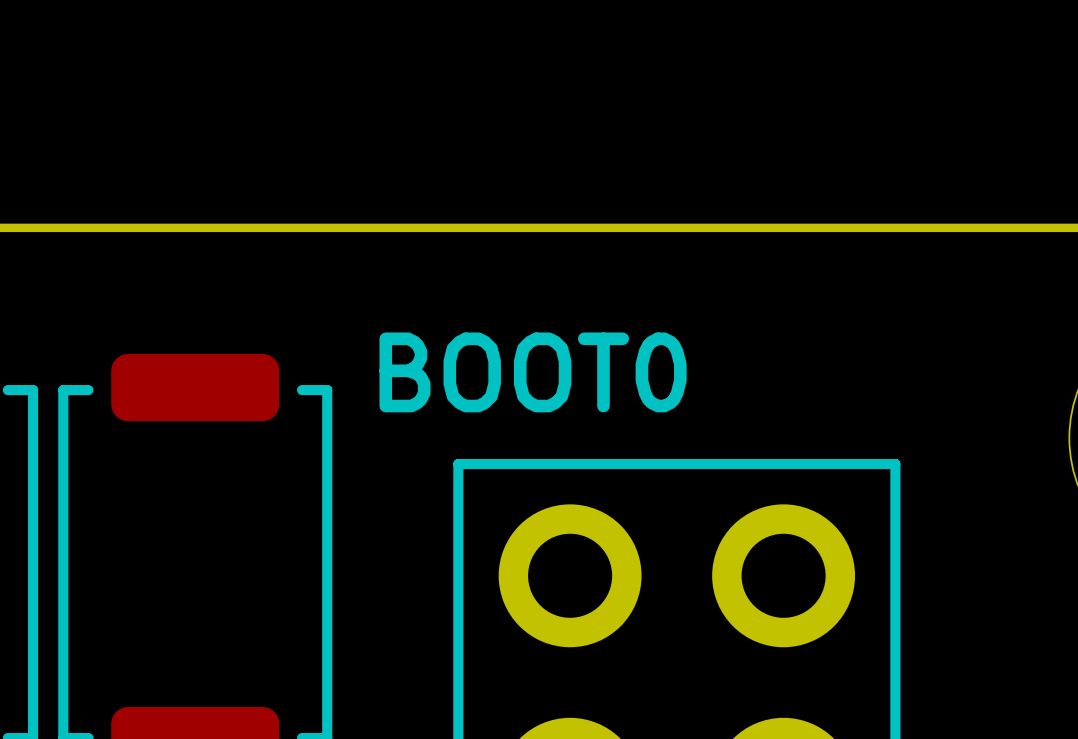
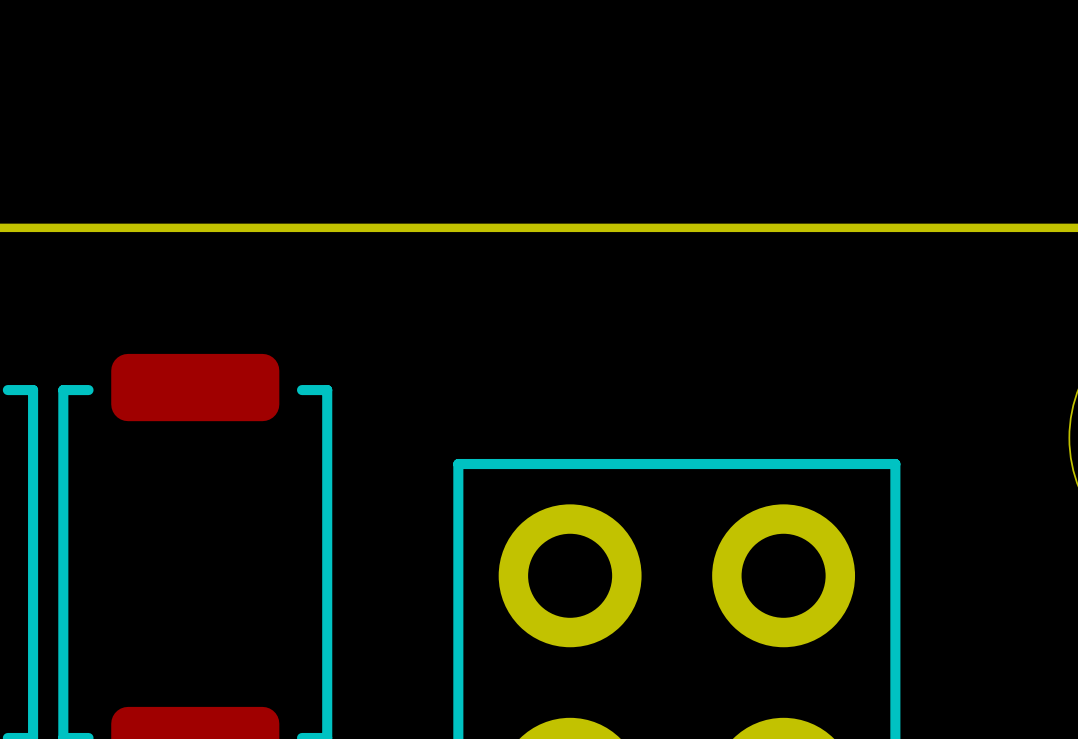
text: BOOT0 (533, 372) -> none

